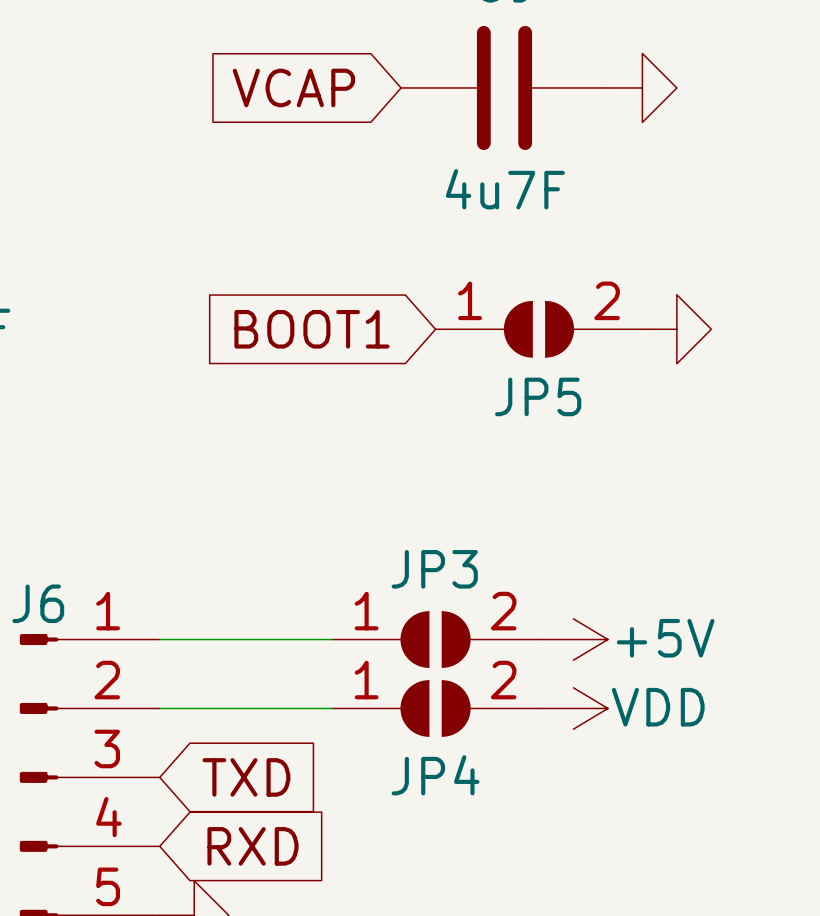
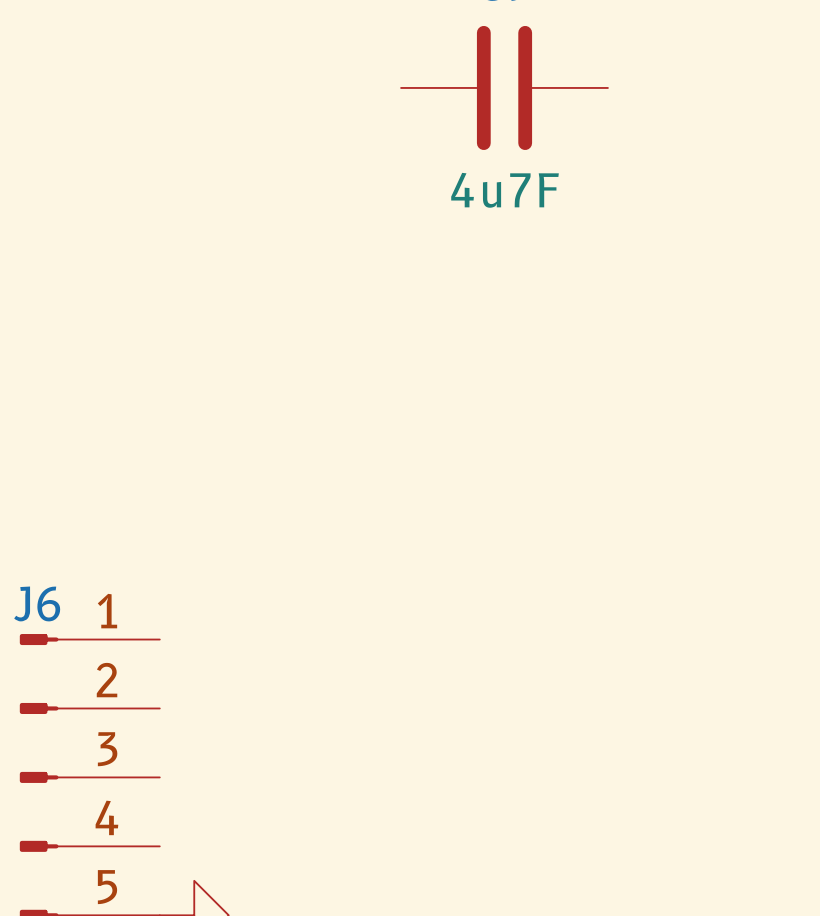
global label: VCAP (293, 87) -> none
power symbol: (642, 87) -> none
global label: BOOT1 (311, 329) -> none
JP5: (538, 329) -> none
power symbol: (676, 329) -> none
wire: (159, 639) (332, 639) -> none
JP3: (435, 639) -> none
power symbol: +5V (573, 639) -> none
wire: (159, 708) (332, 708) -> none
JP4: (435, 708) -> none
power symbol: VDD (573, 708) -> none
global label: TXD (246, 777) -> none
global label: RXD (252, 846) -> none

